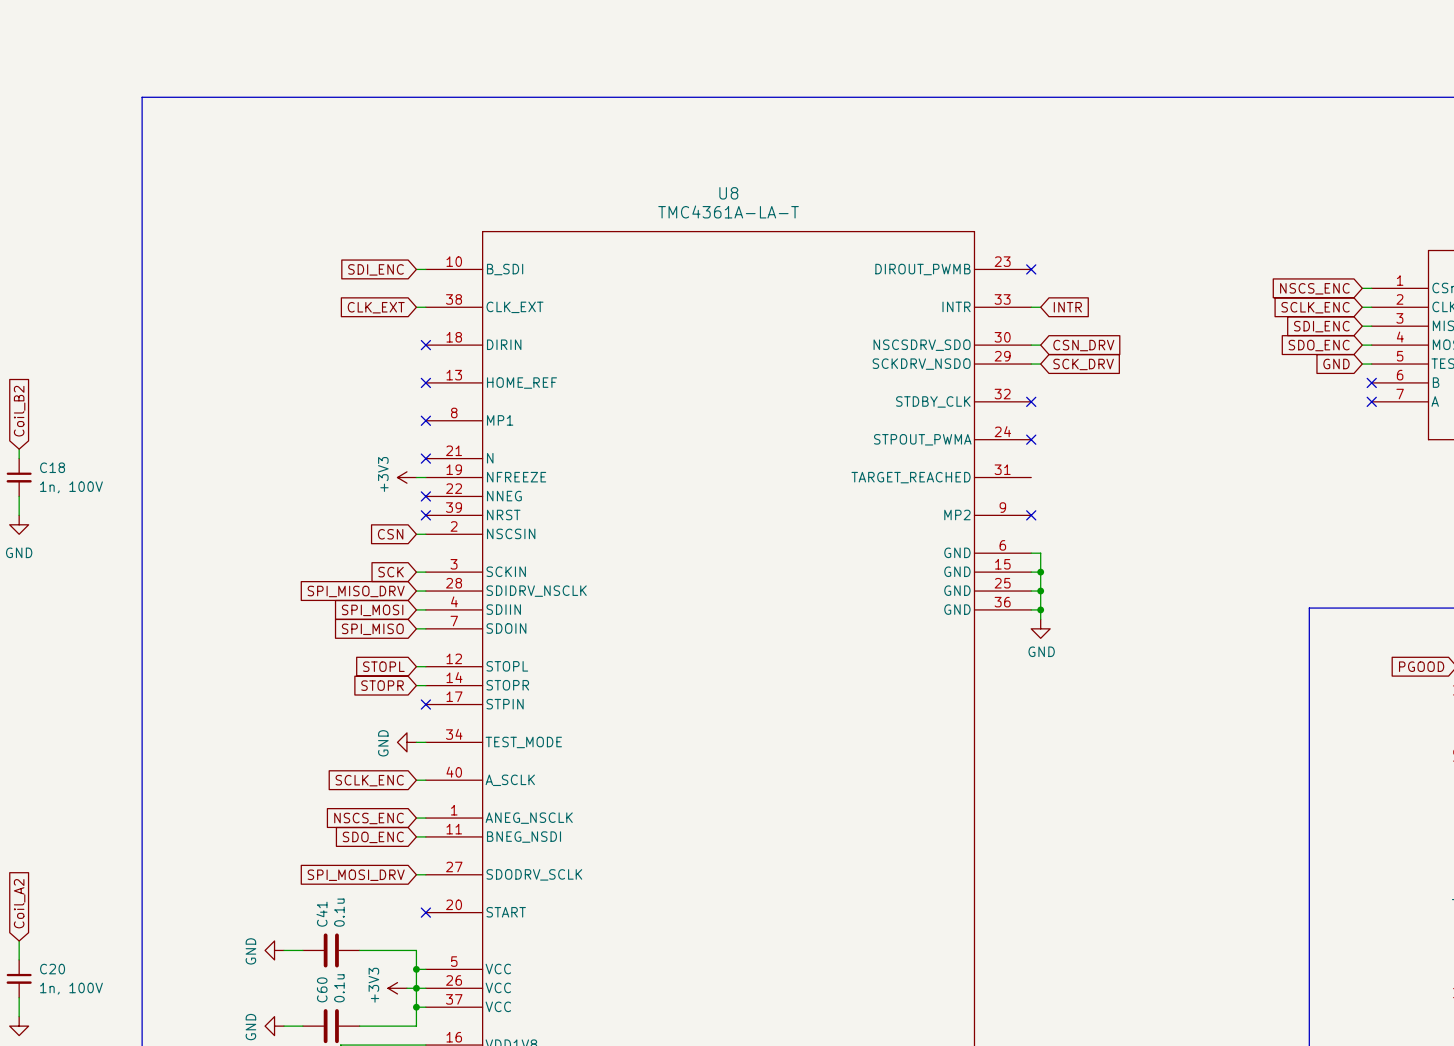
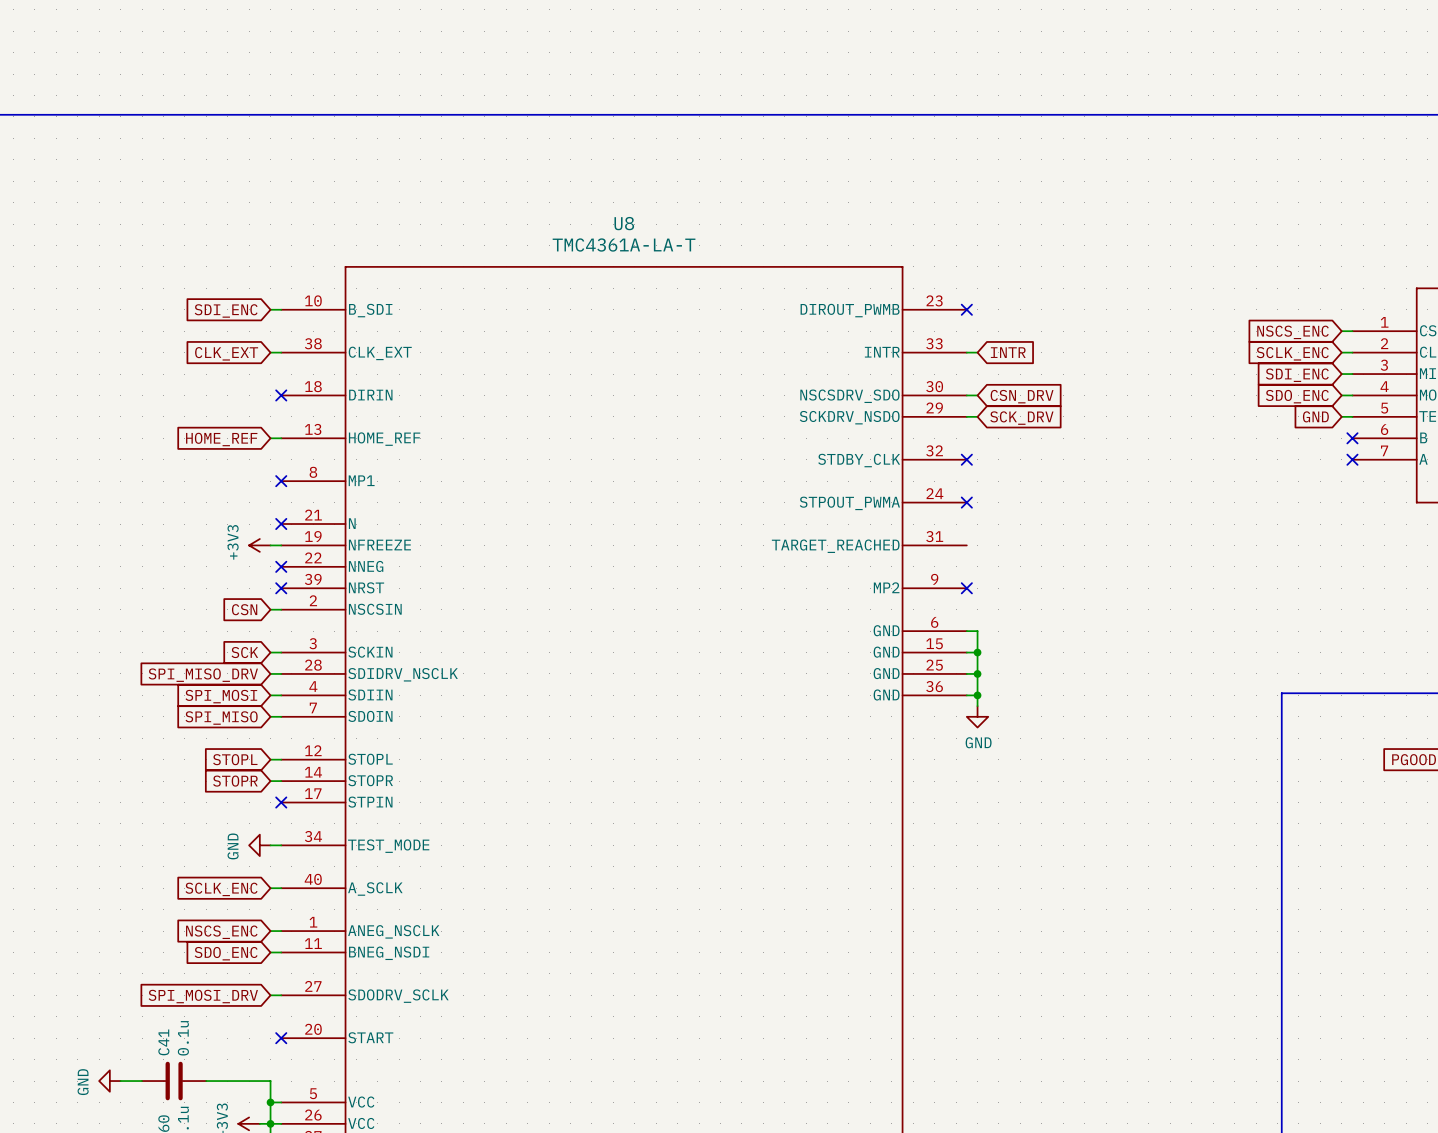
wire: none -> (270, 438) (281, 438)
no-connect mark: (425, 382) -> none
global label: none -> HOME_REF (221, 439)

